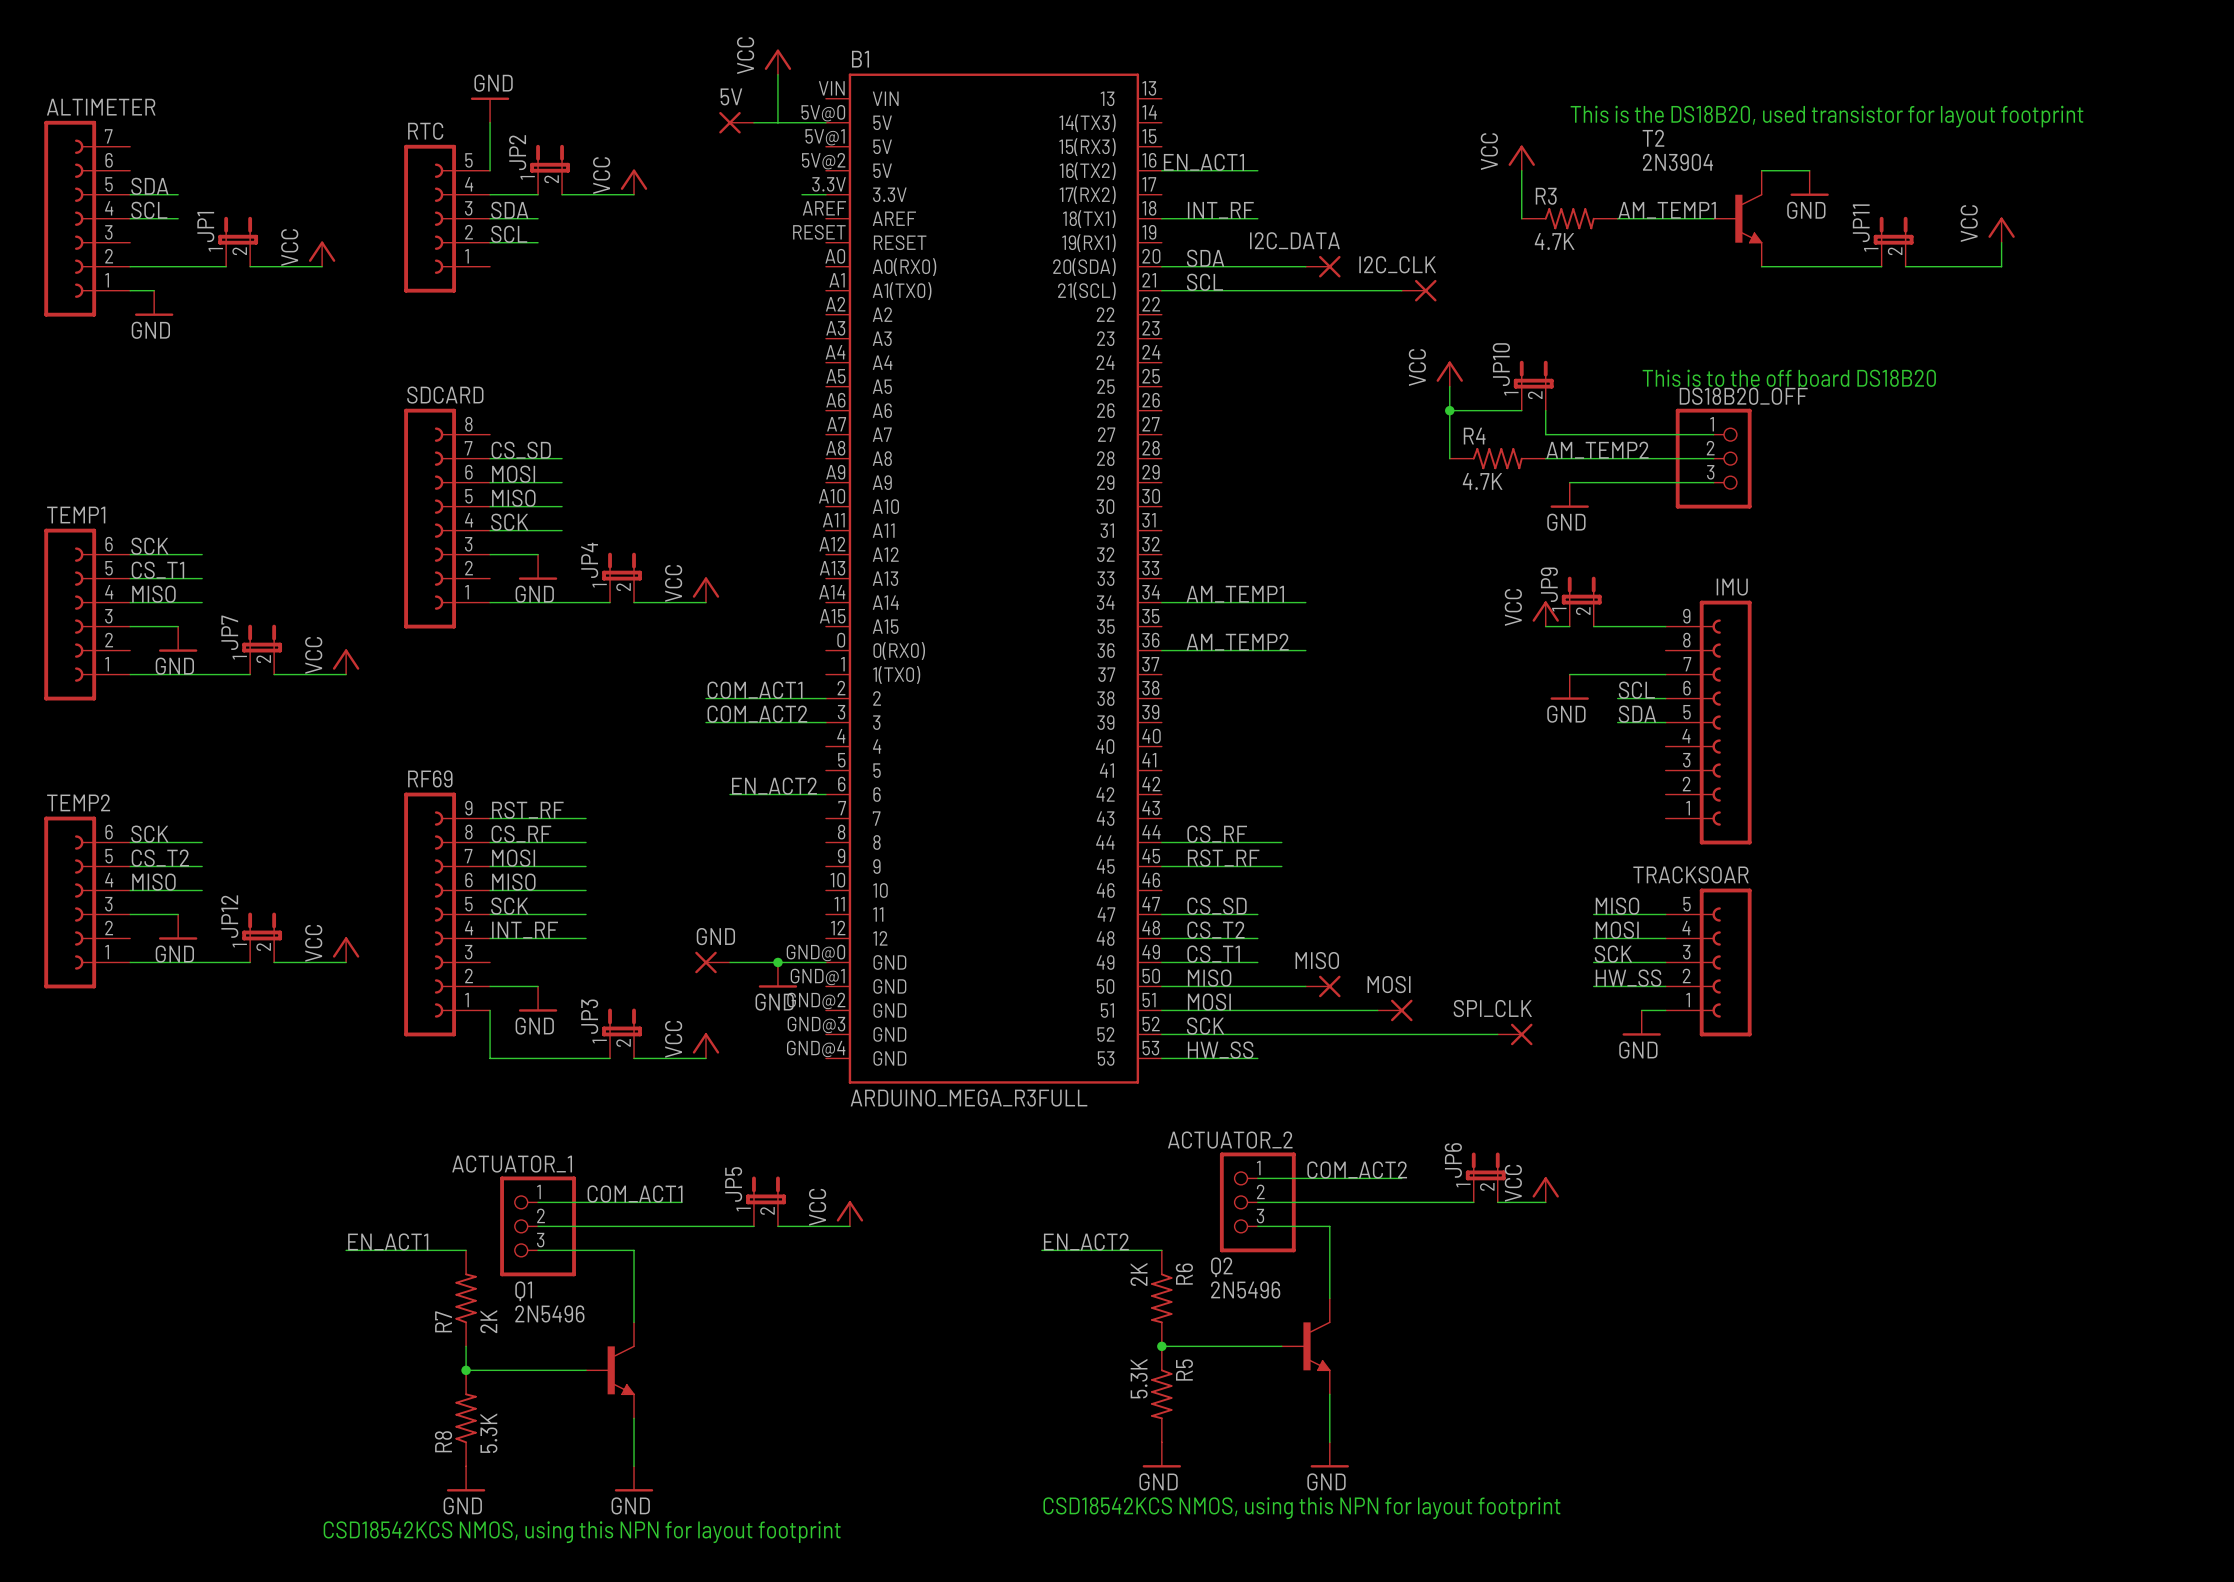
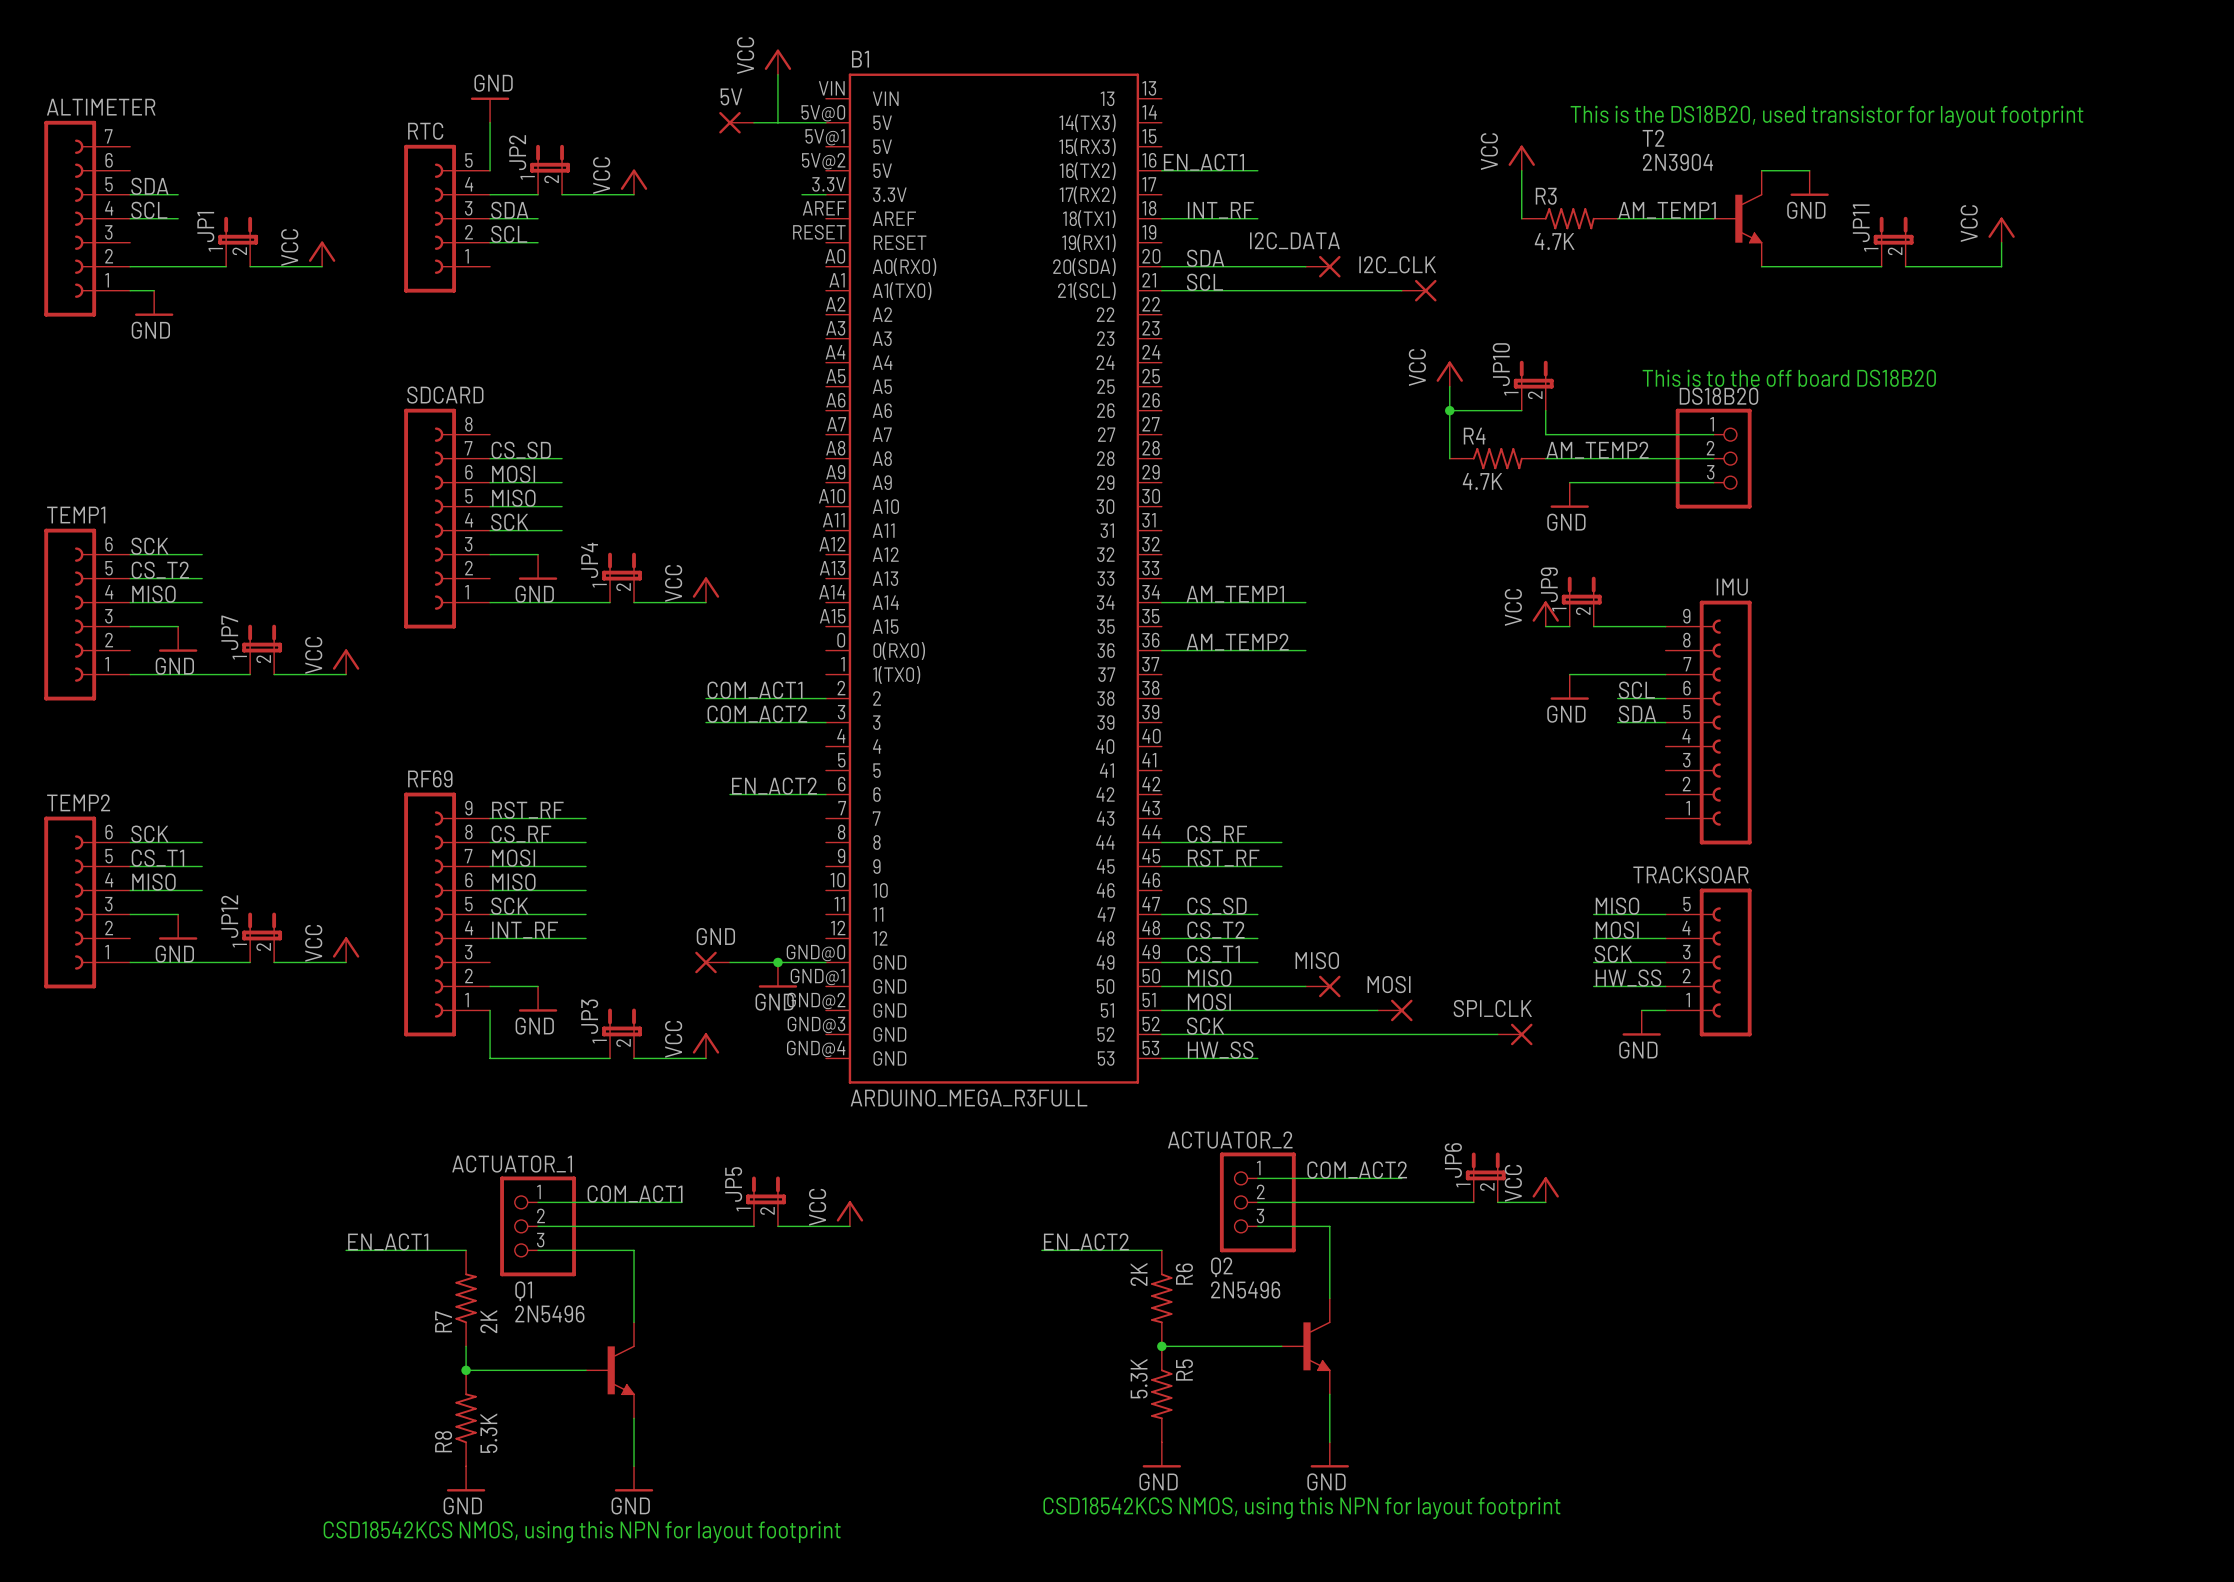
DS18B20_OFF name: DS18B20_OFF (1743, 396) -> DS18B20 (1718, 396)
label: CS_T1 (157, 570) -> CS_T2 (160, 570)
label: CS_T2 (160, 858) -> CS_T1 (157, 858)

